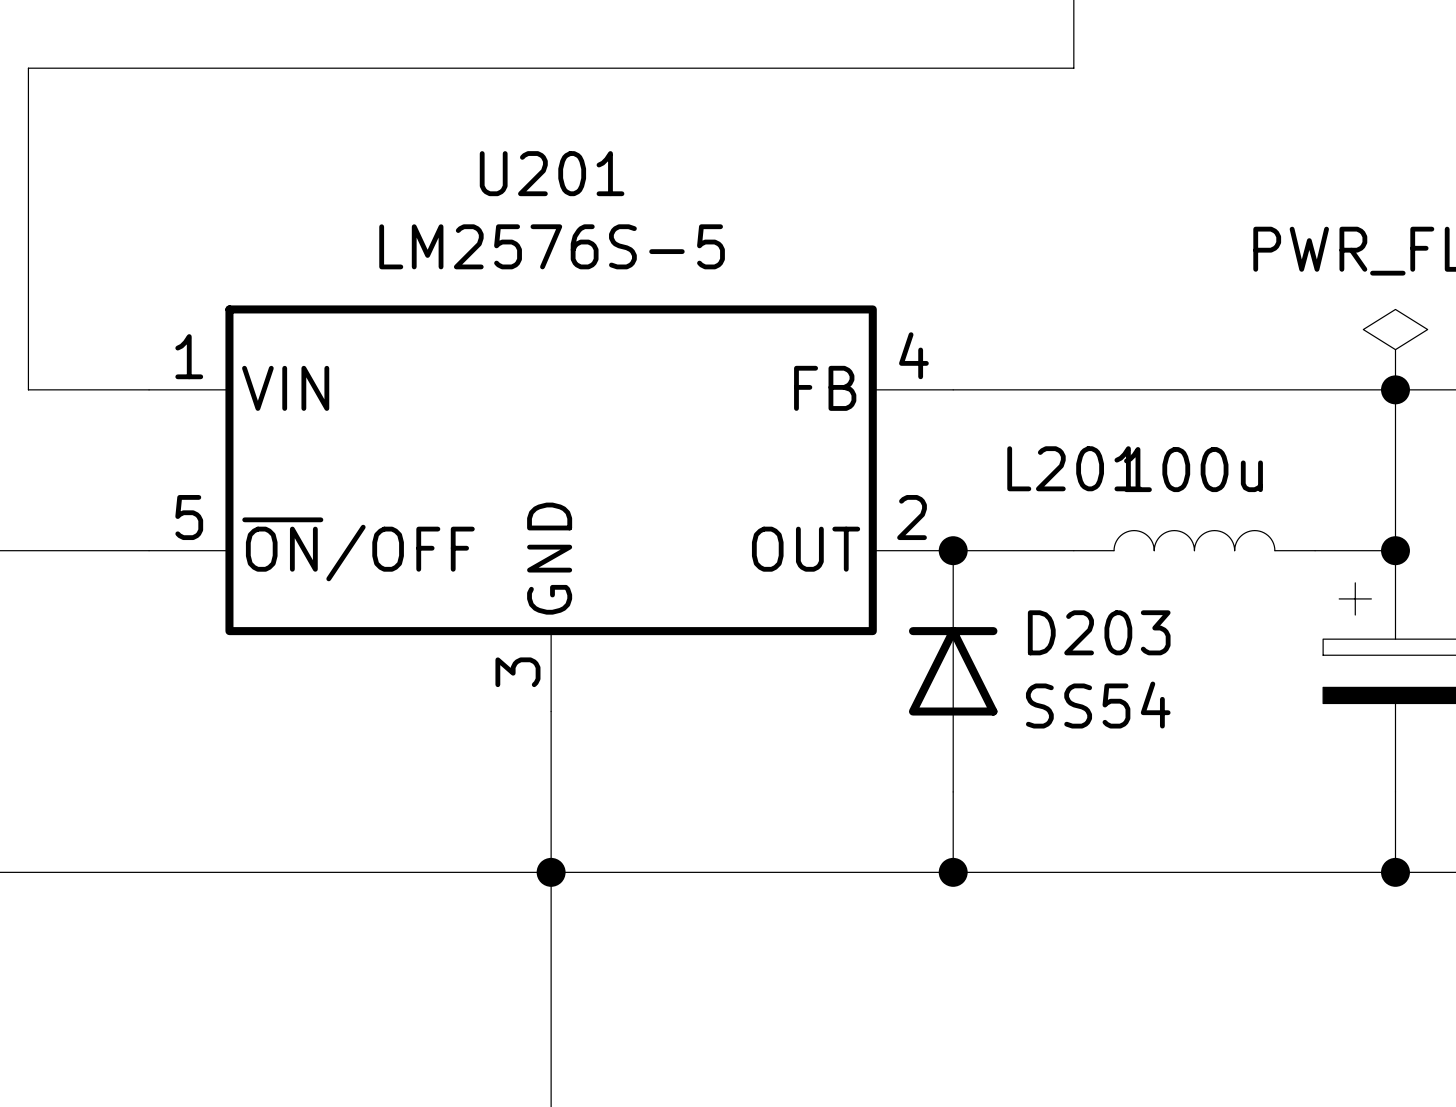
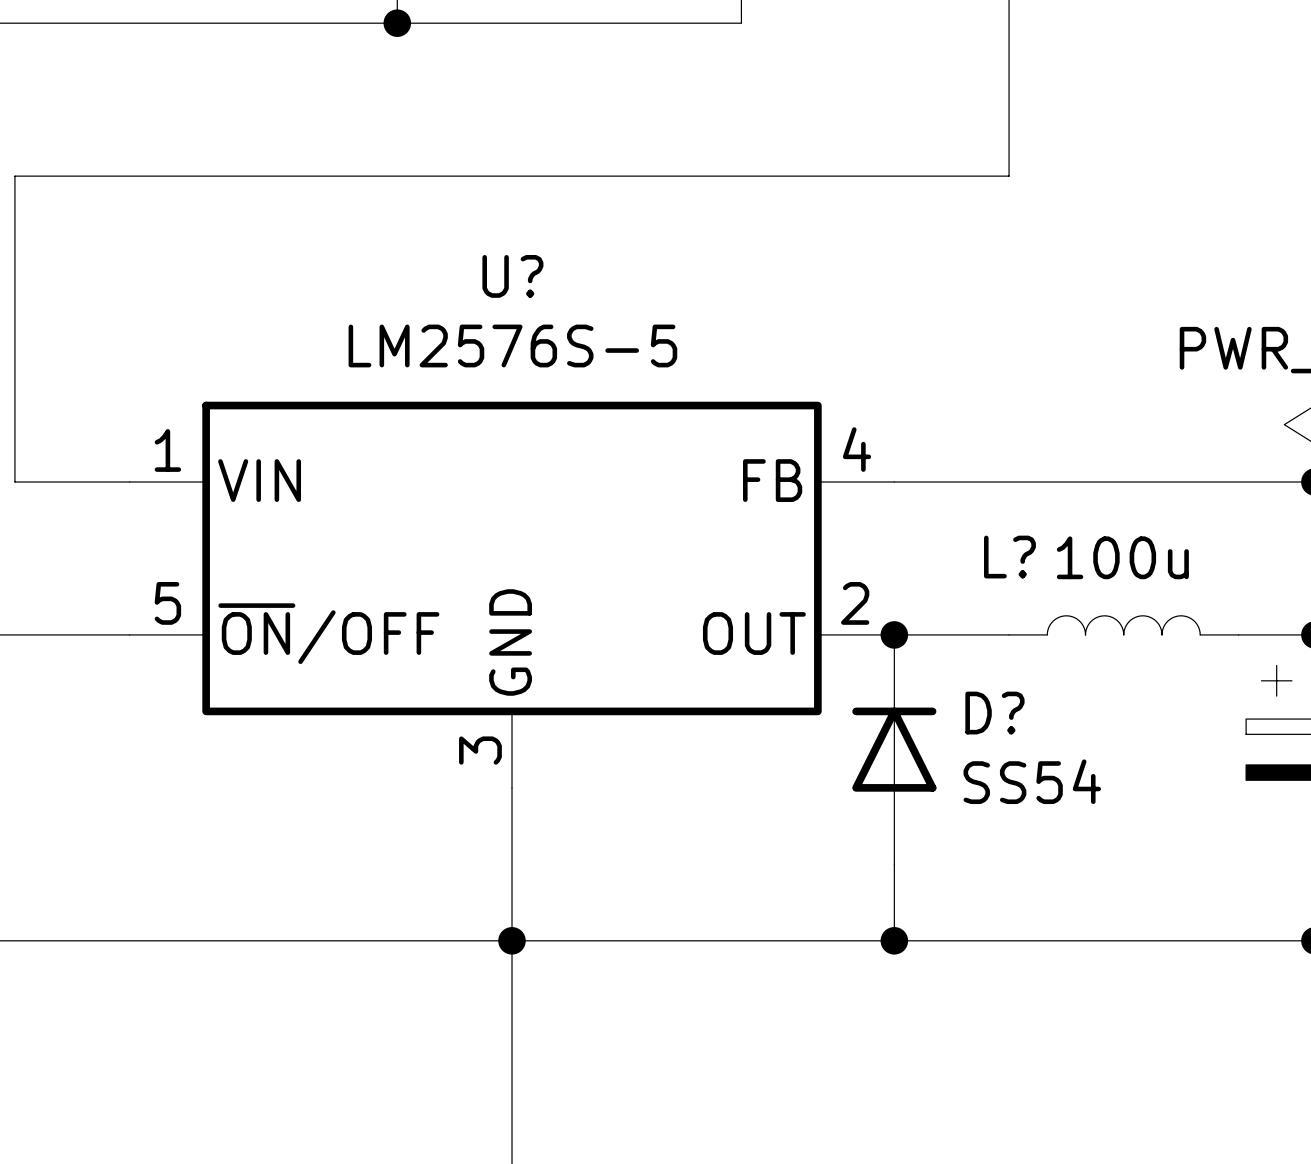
U201 name: U201 (552, 173) -> U? (512, 276)
L201 name: L201 (1074, 468) -> L? (1009, 557)
D203 name: D203 (1099, 632) -> D? (994, 713)

